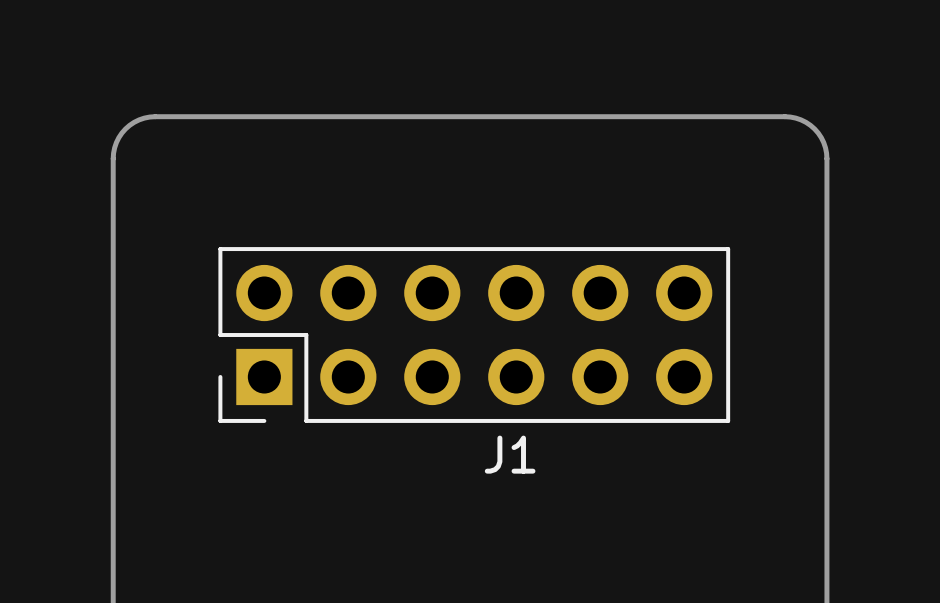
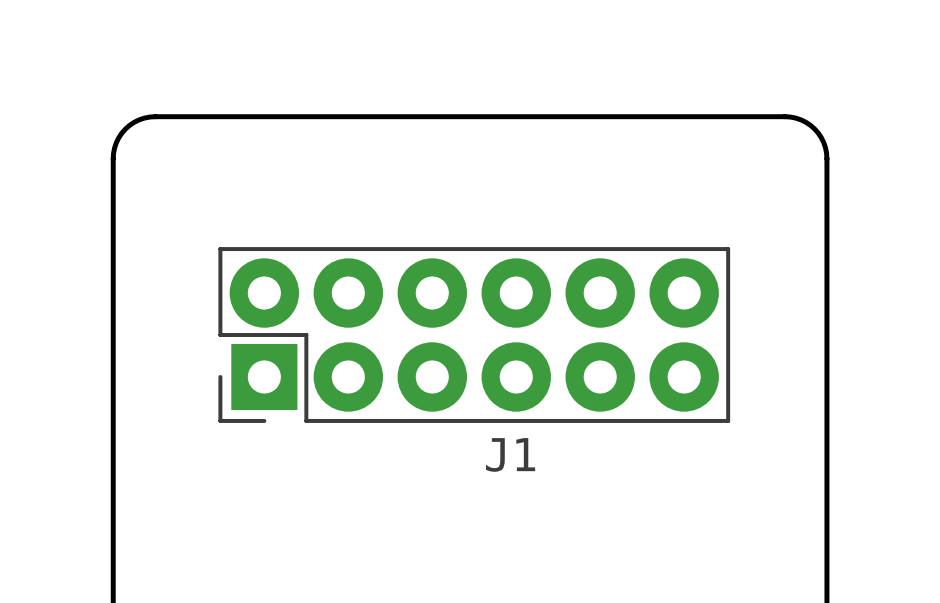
J1 footprint: [218, 247, 731, 423] -> [218, 247, 731, 423]

